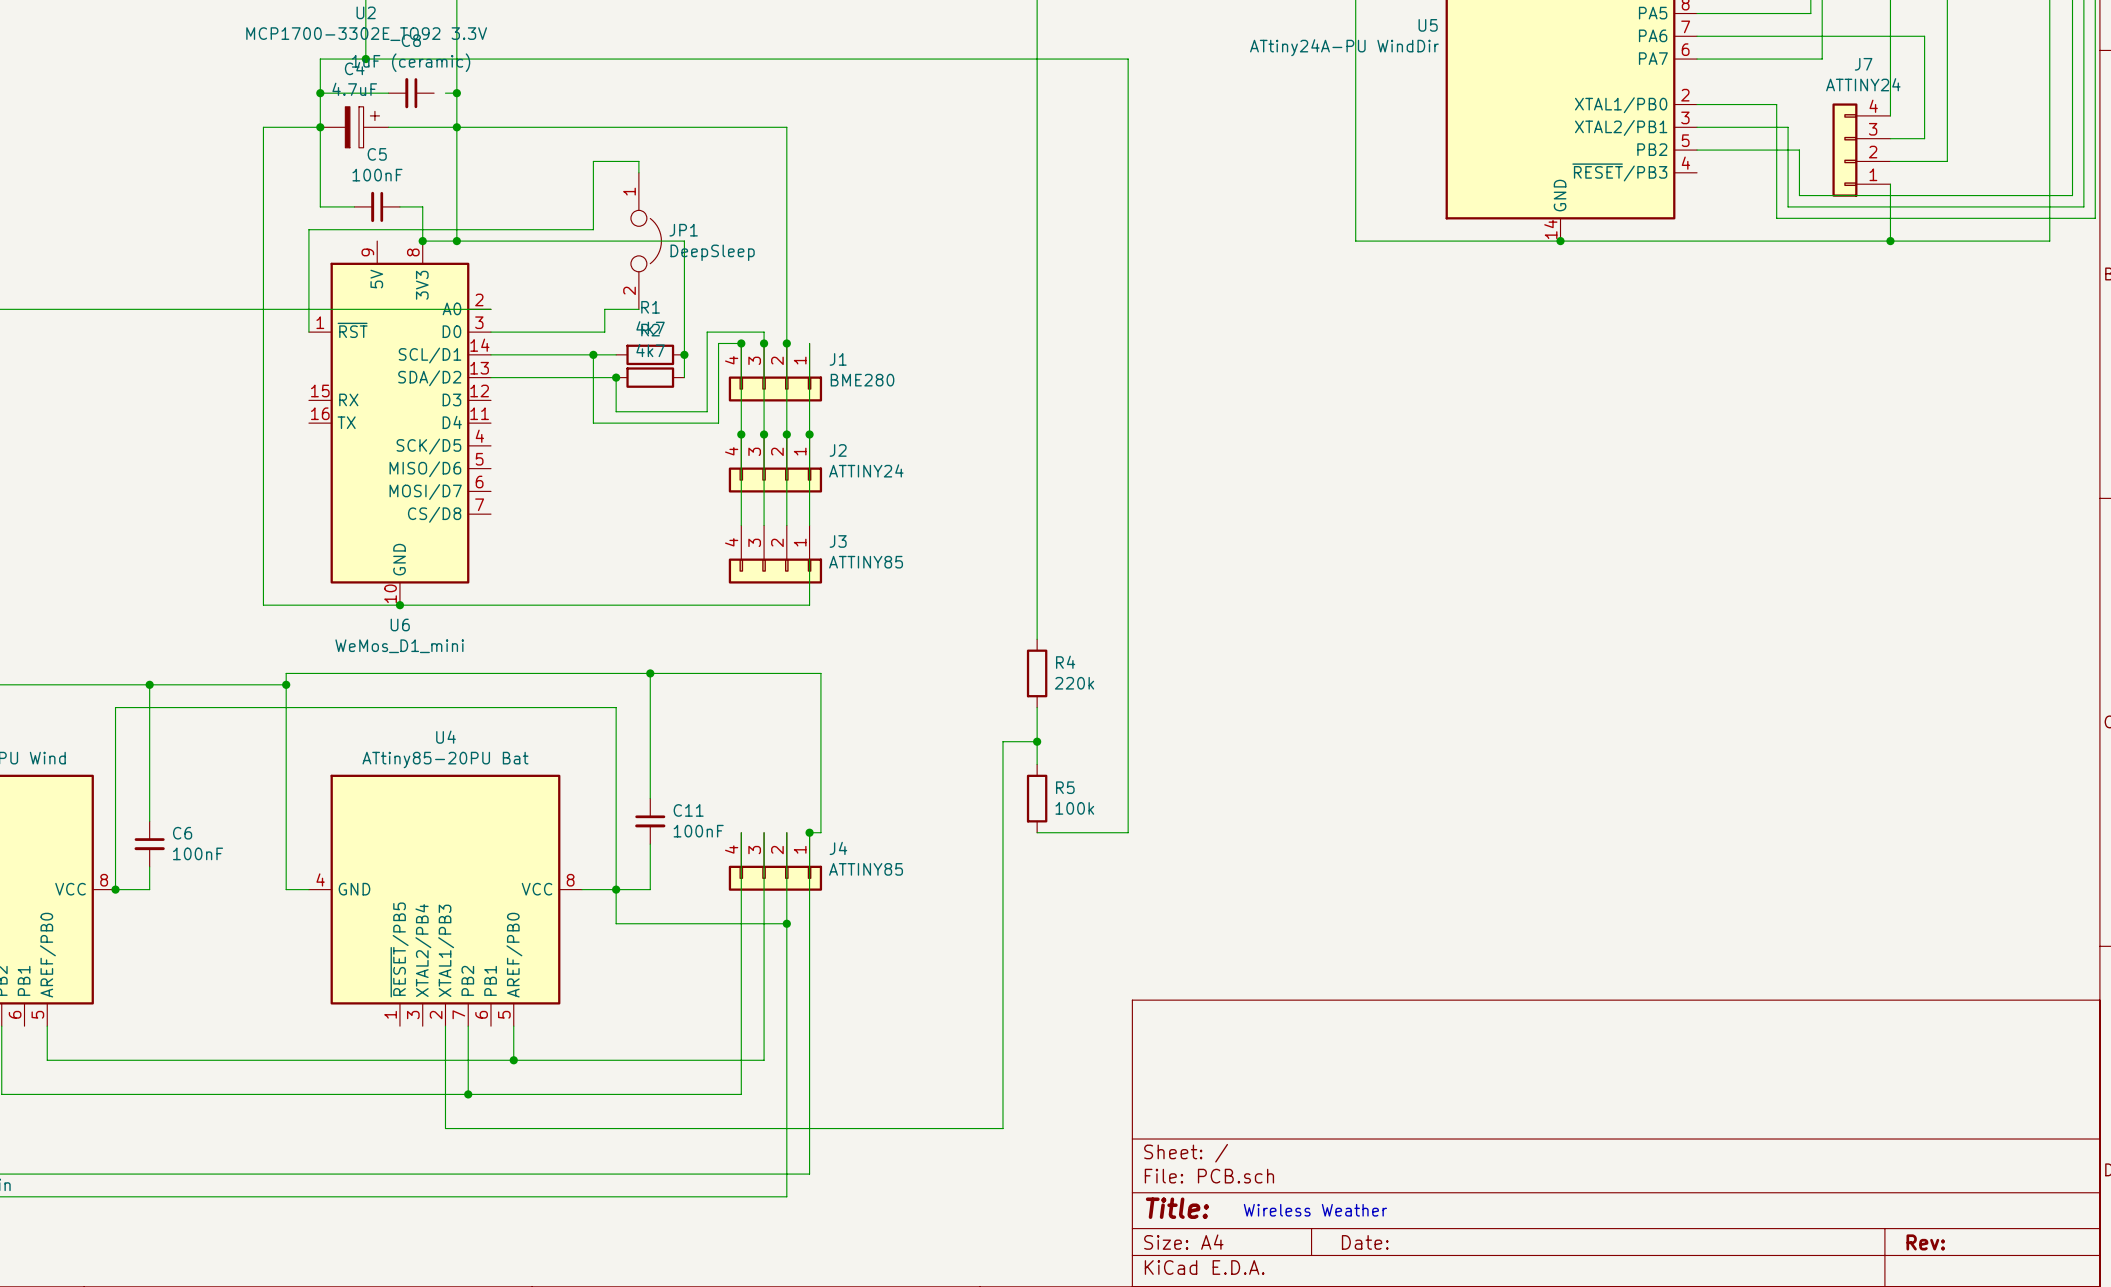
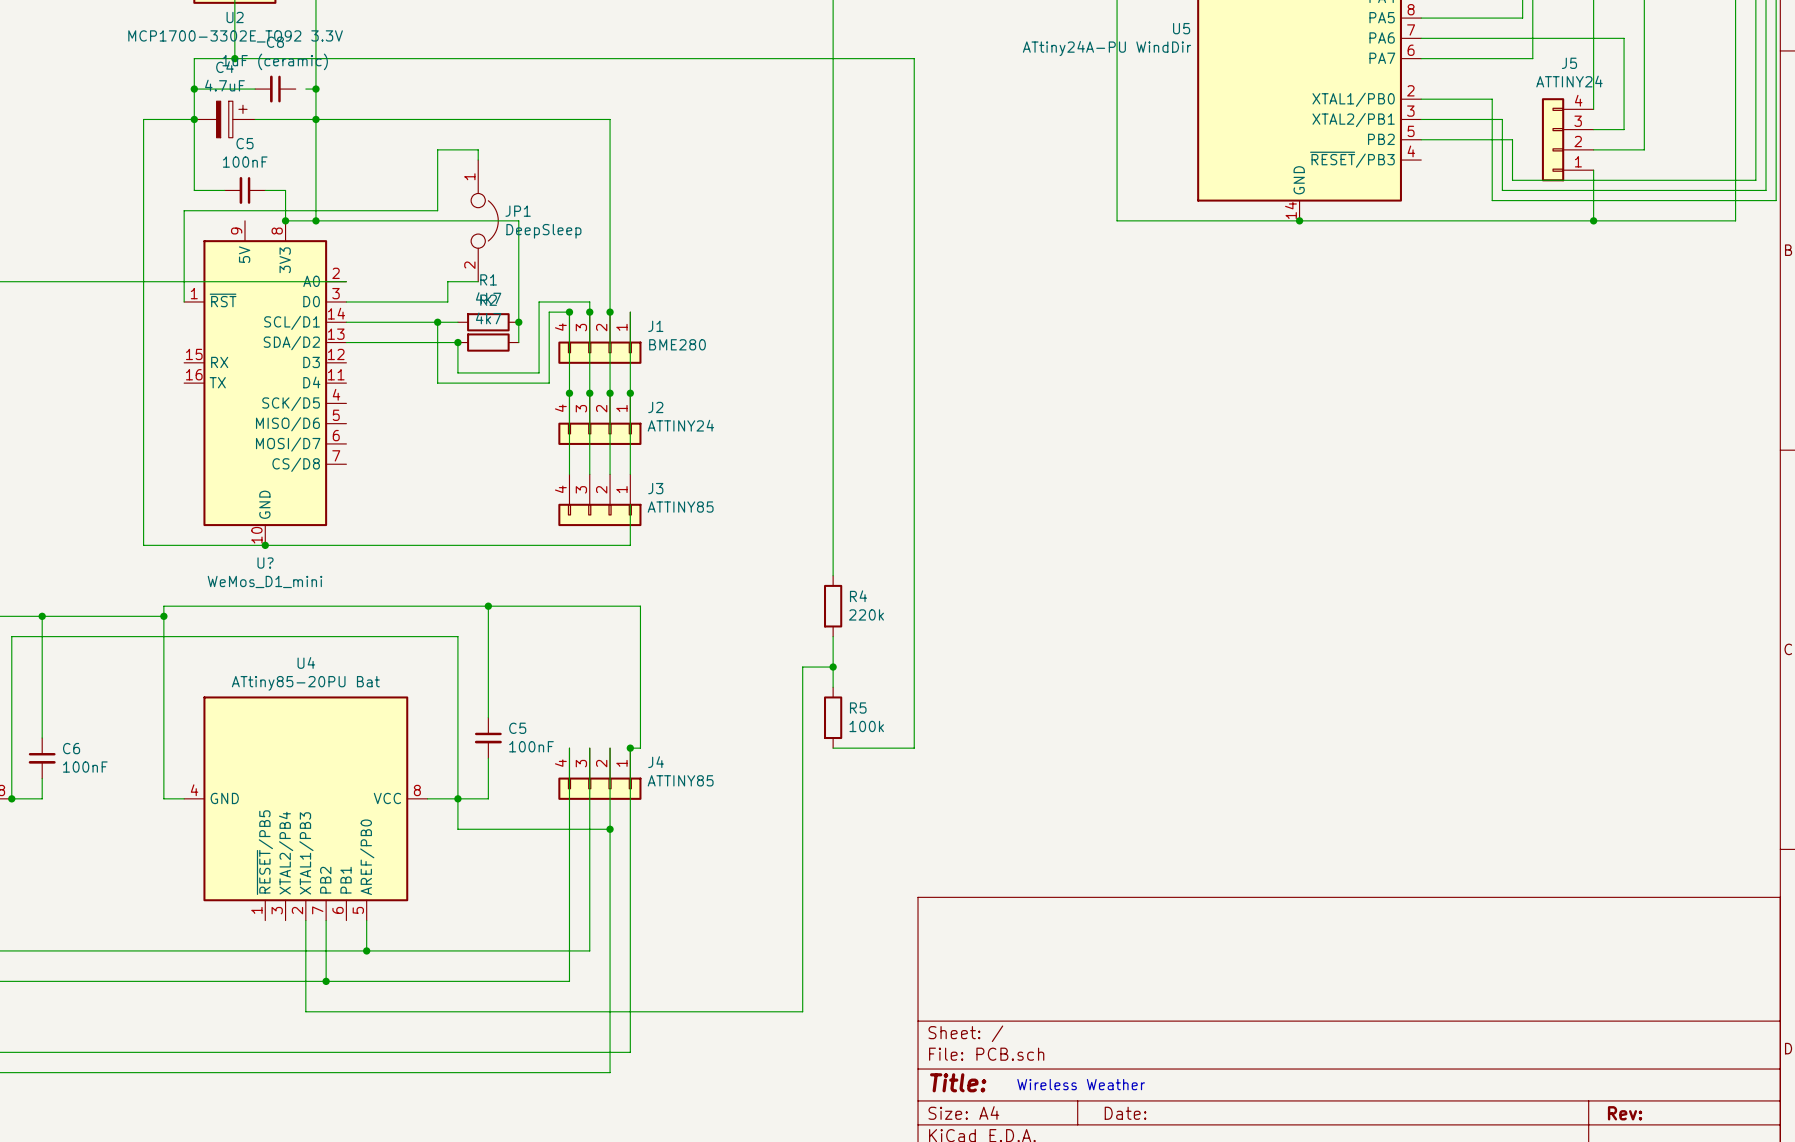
J7 name: J7 (1863, 64) -> J5 (1569, 63)
U6 name: U6 (400, 624) -> U? (265, 563)
C11 name: C11 (688, 810) -> C5 (517, 728)

